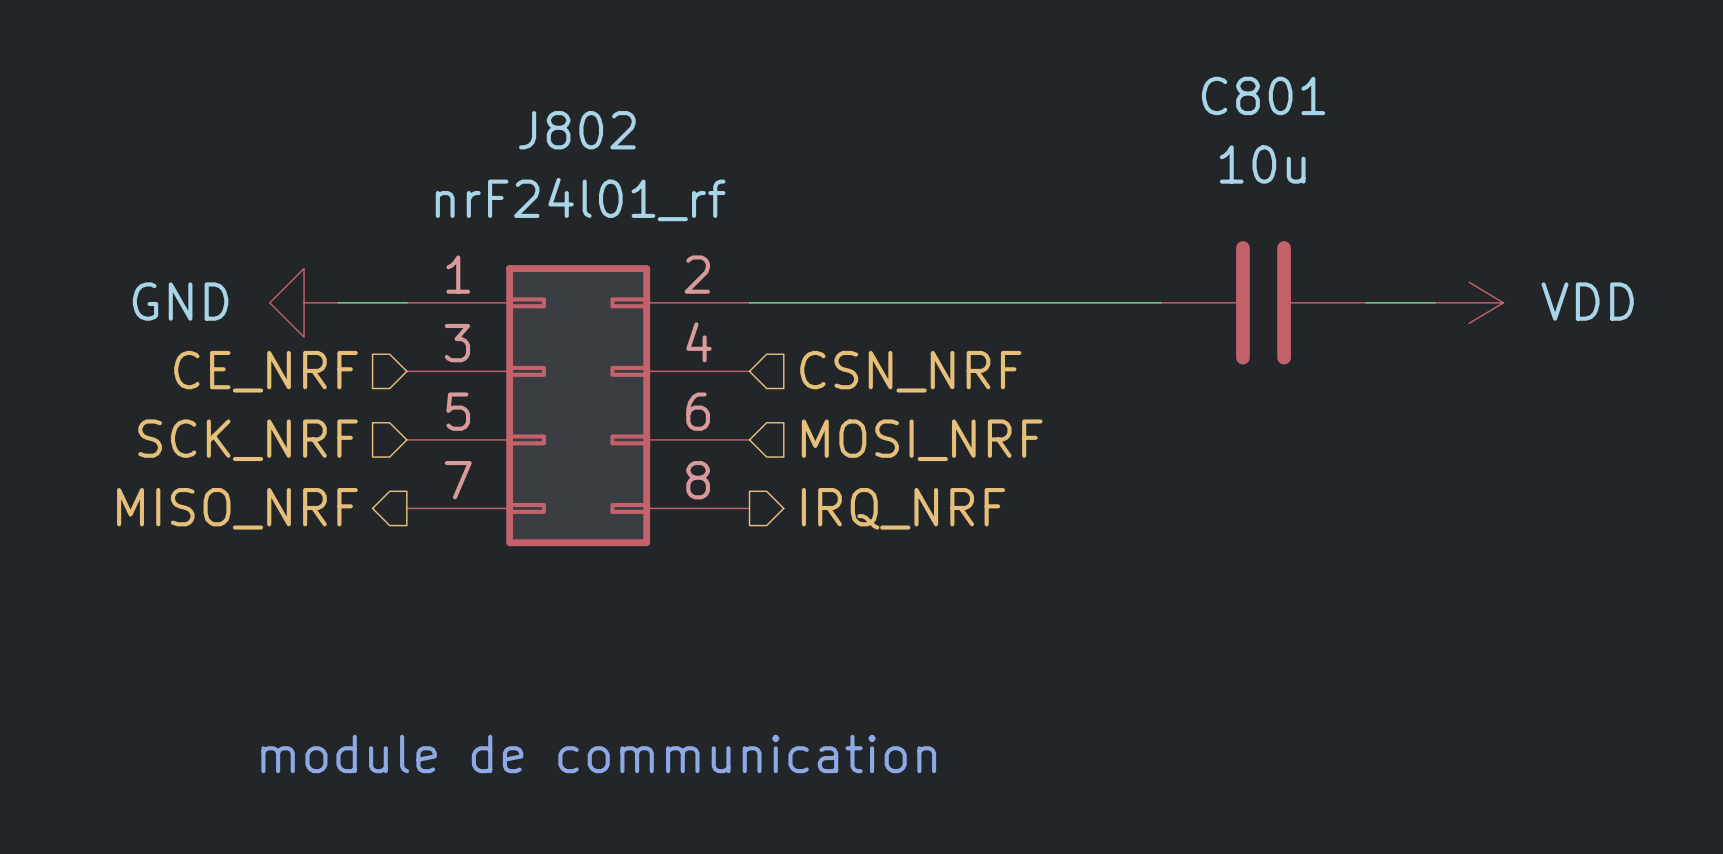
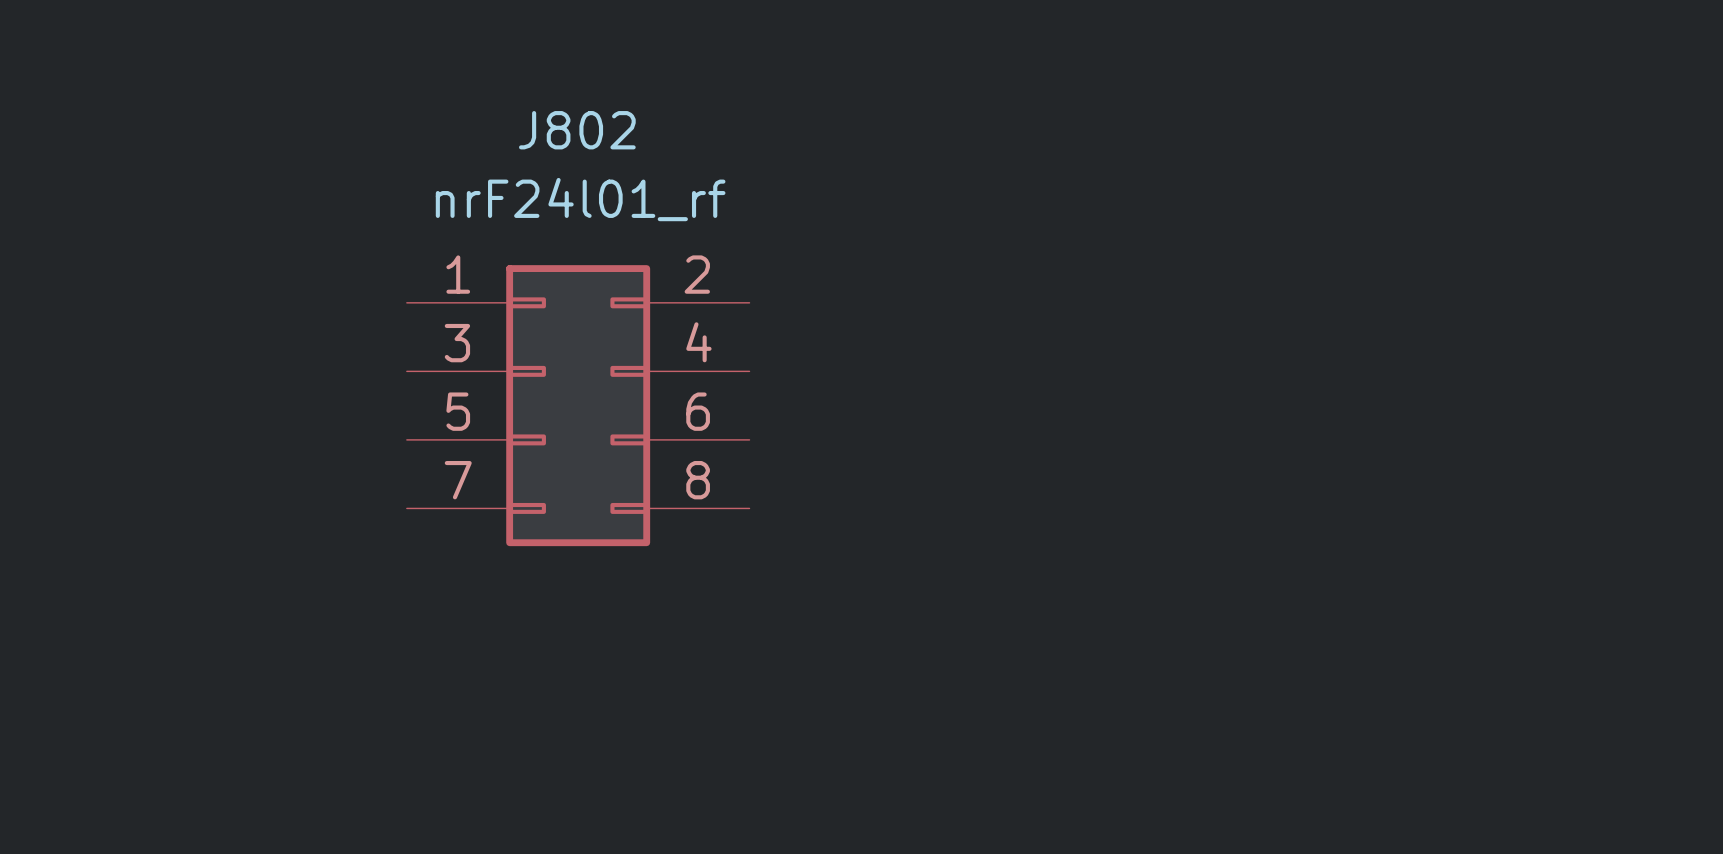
power symbol: GND (304, 302) -> none
wire: (338, 302) (406, 302) -> none
wire: (749, 302) (1160, 302) -> none
C801: 10u (1263, 302) -> none
wire: (1366, 302) (1434, 302) -> none
power symbol: VDD (1469, 302) -> none
hierarchical label: CE_NRF (265, 371) -> none
hierarchical label: CSN_NRF (910, 371) -> none
hierarchical label: SCK_NRF (248, 440) -> none
hierarchical label: MOSI_NRF (922, 440) -> none
hierarchical label: MISO_NRF (237, 508) -> none
hierarchical label: IRQ_NRF (903, 508) -> none
text: module de communication (598, 753) -> none

